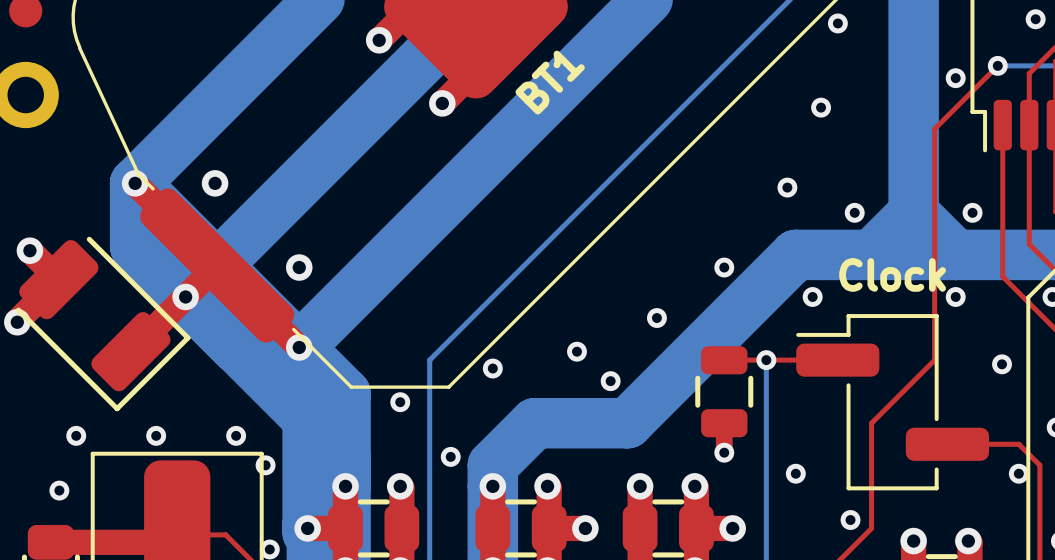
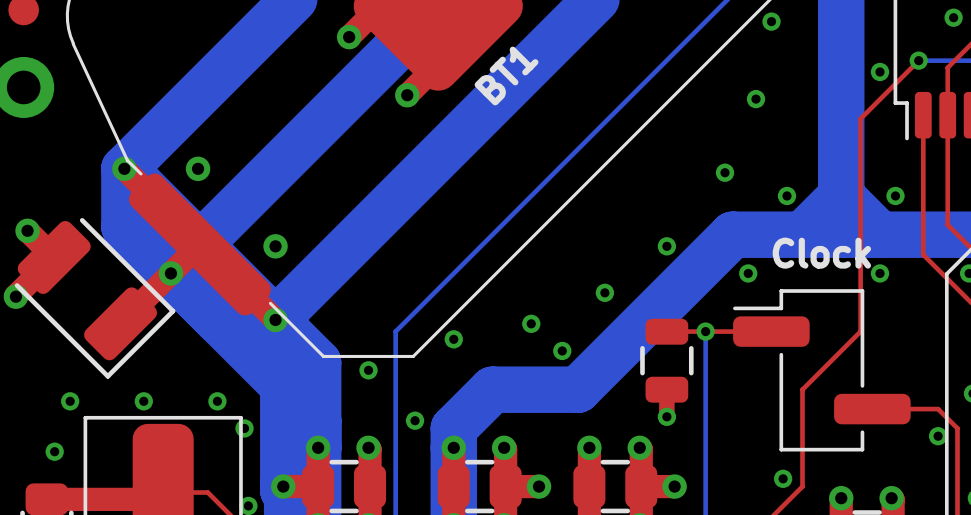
via: (1002, 364) -> none
via: (795, 473) -> none

